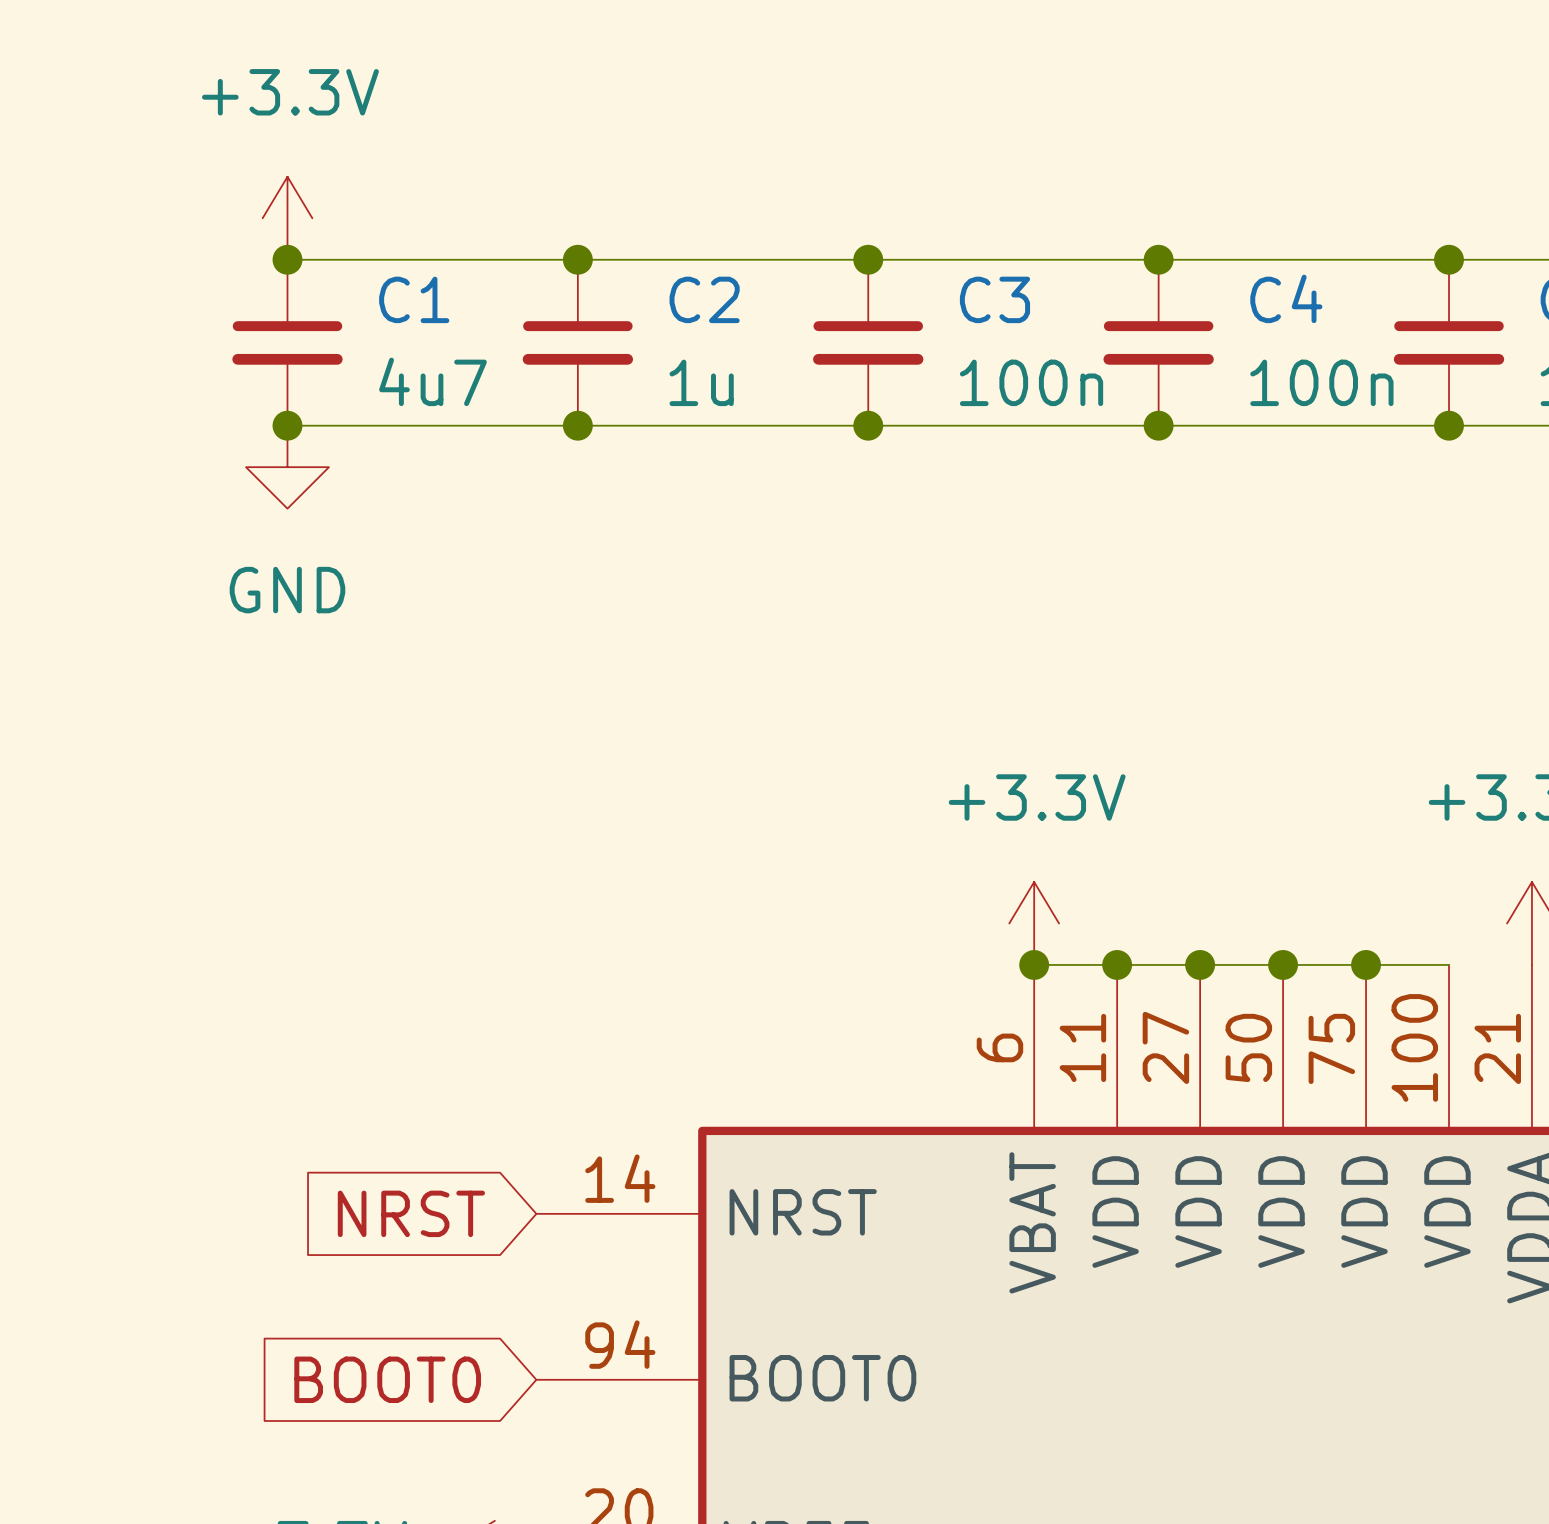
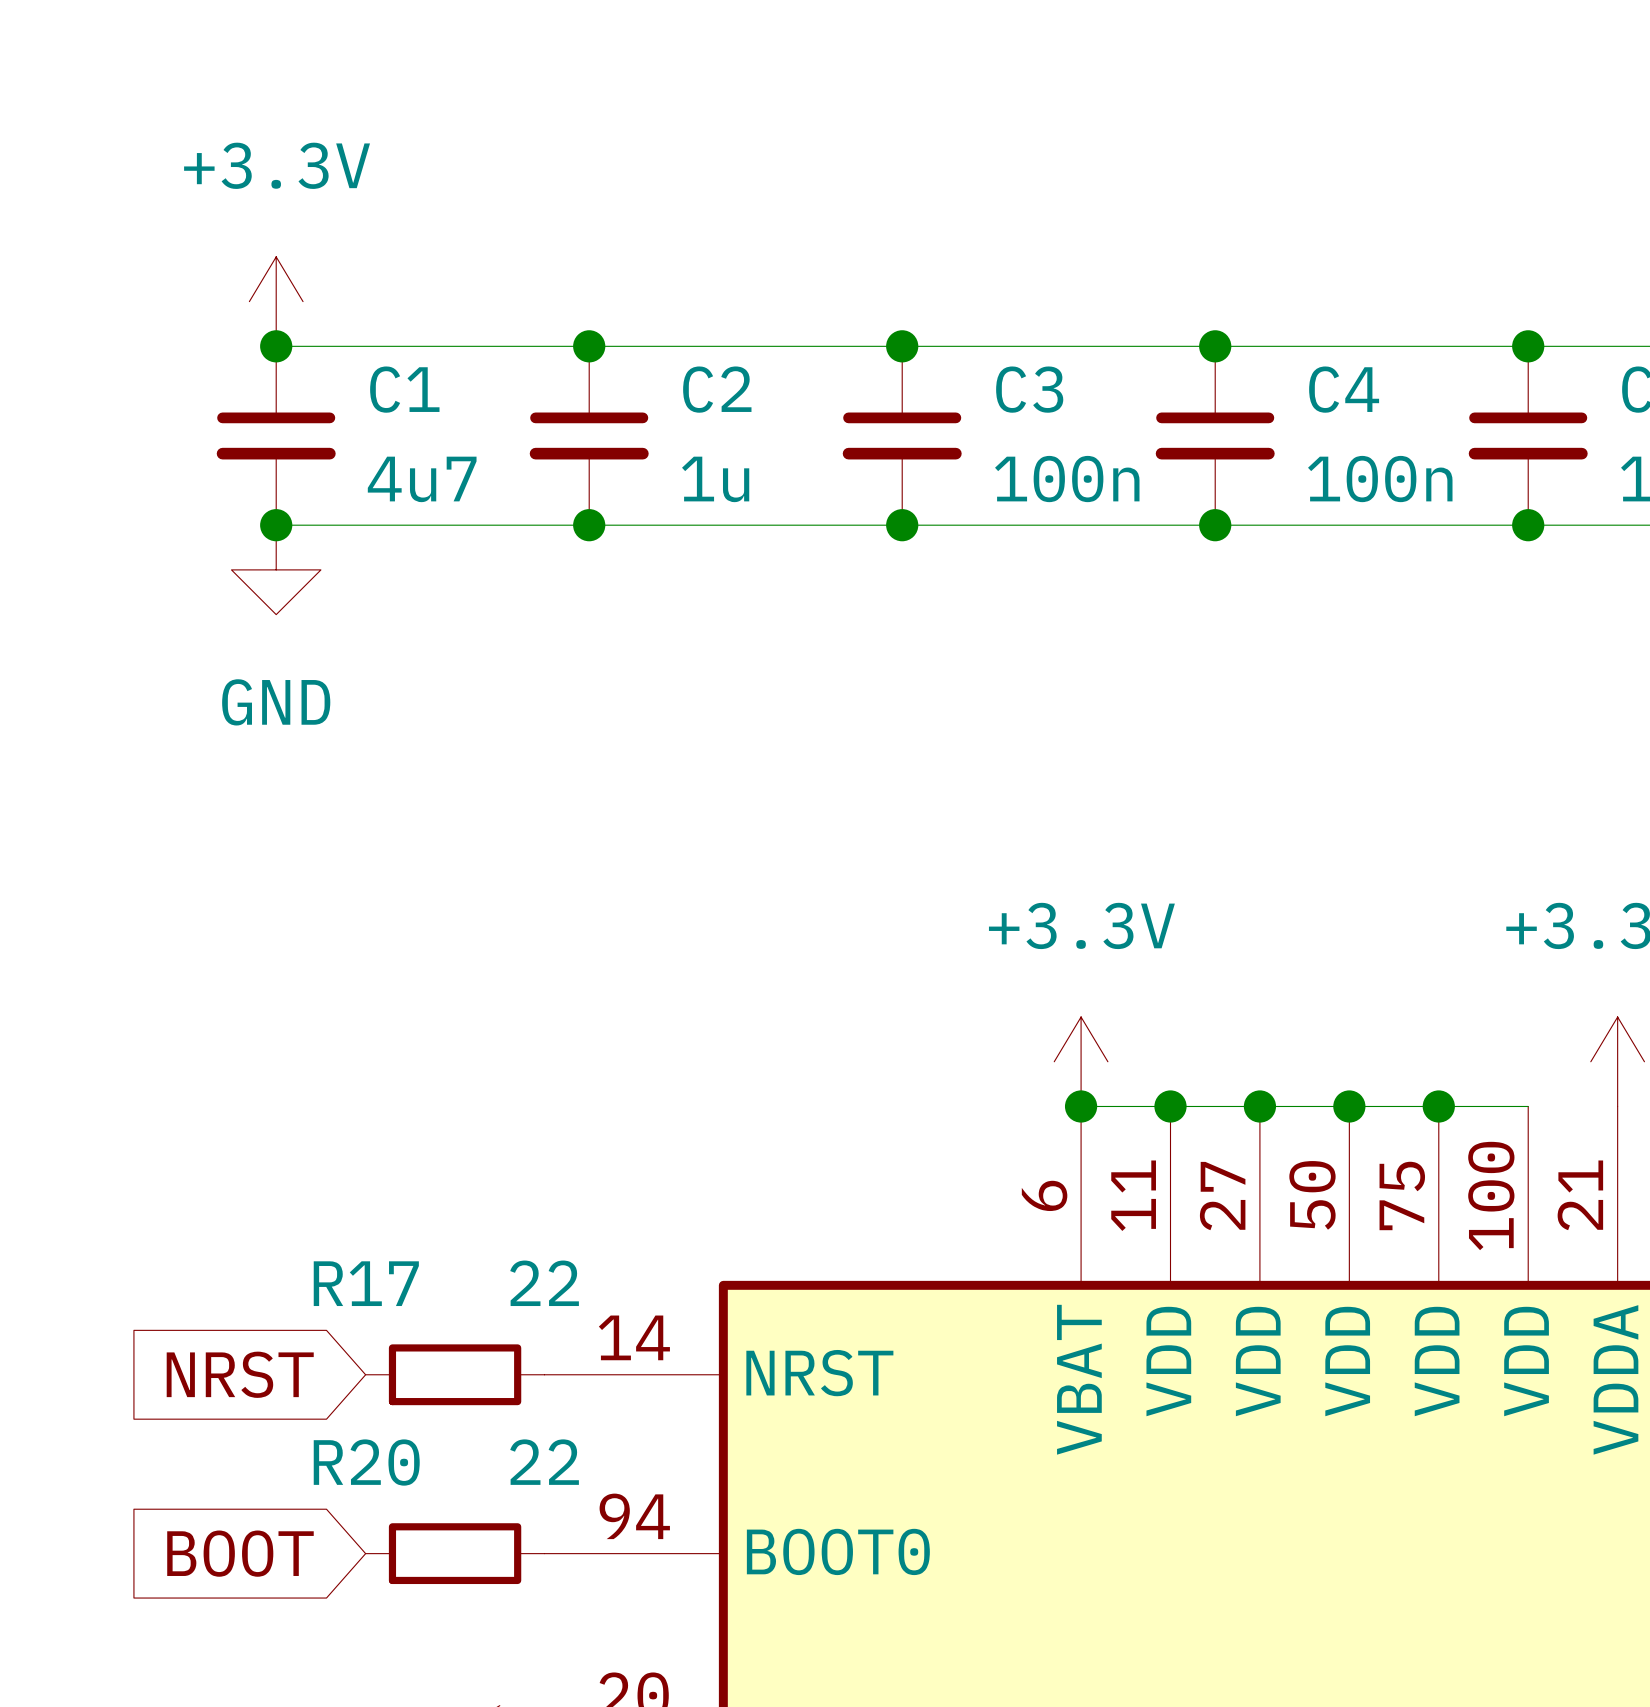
global label position: NRST (411, 1213) -> NRST (240, 1374)
R17: none -> 22 (455, 1374)
global label: BOOT0 (387, 1379) -> BOOT (240, 1553)
R20: none -> 22 (455, 1553)

